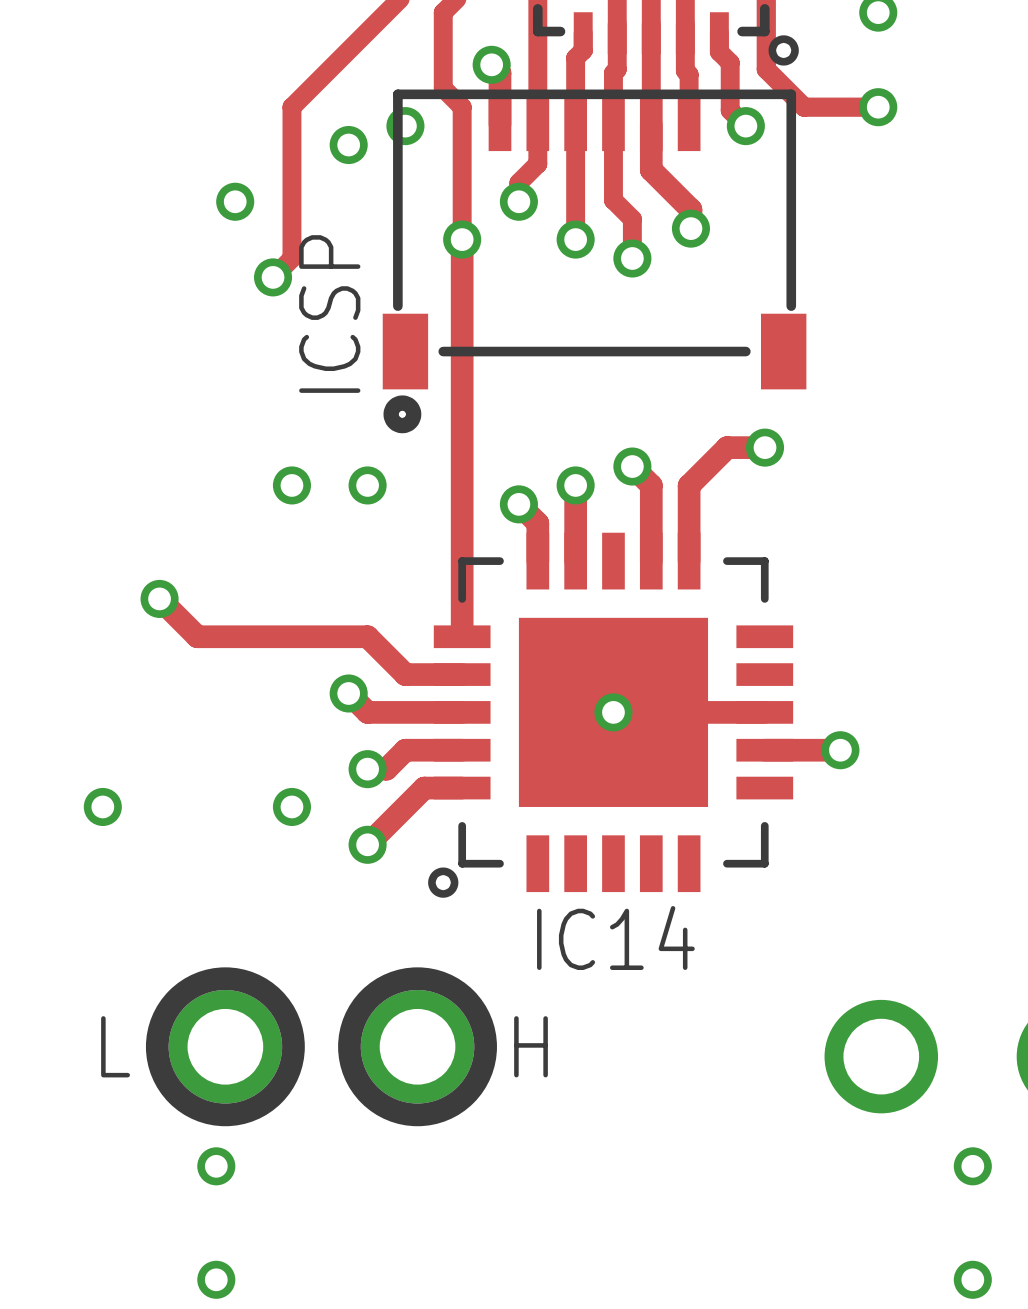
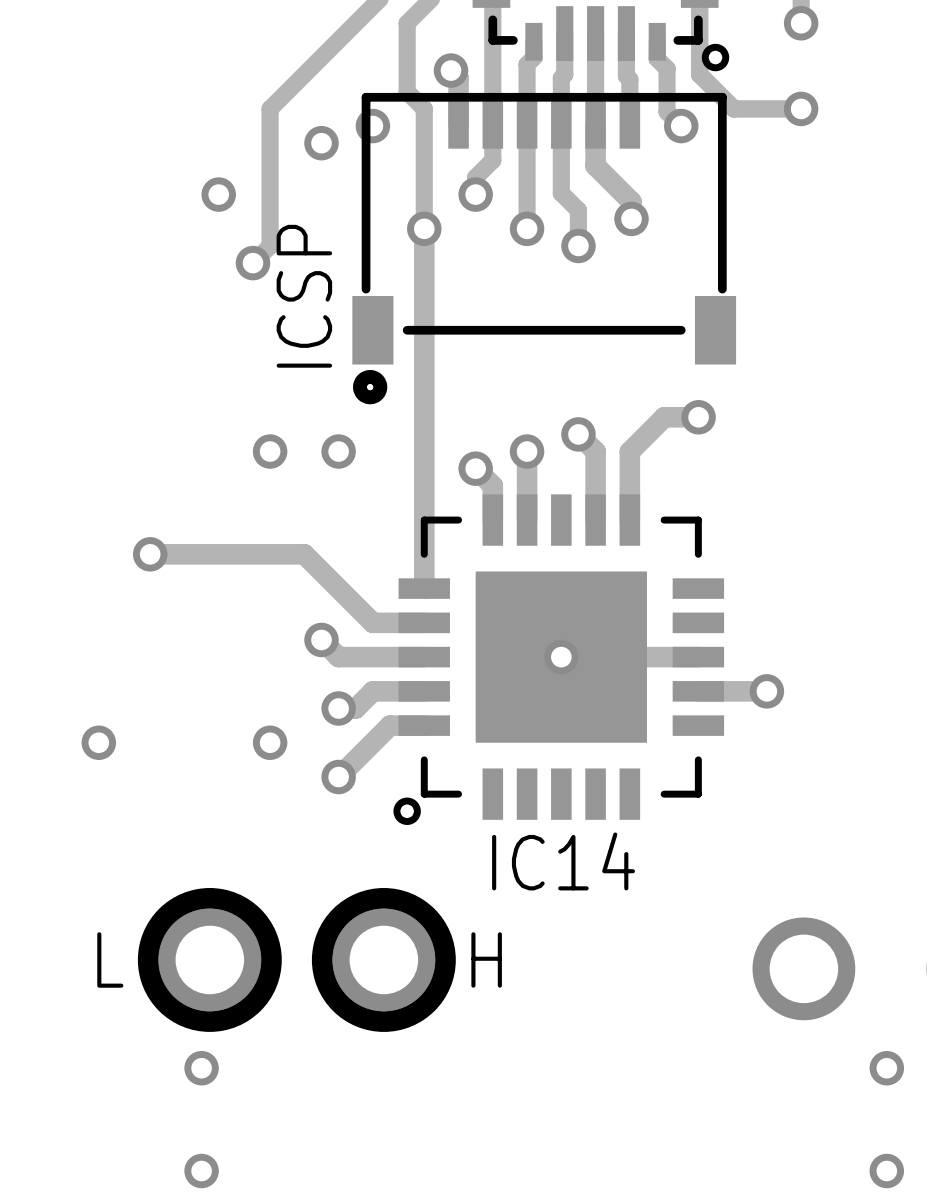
track: (159, 598) (197, 636) (367, 636) -> (150, 554) (304, 554) (338, 588)

